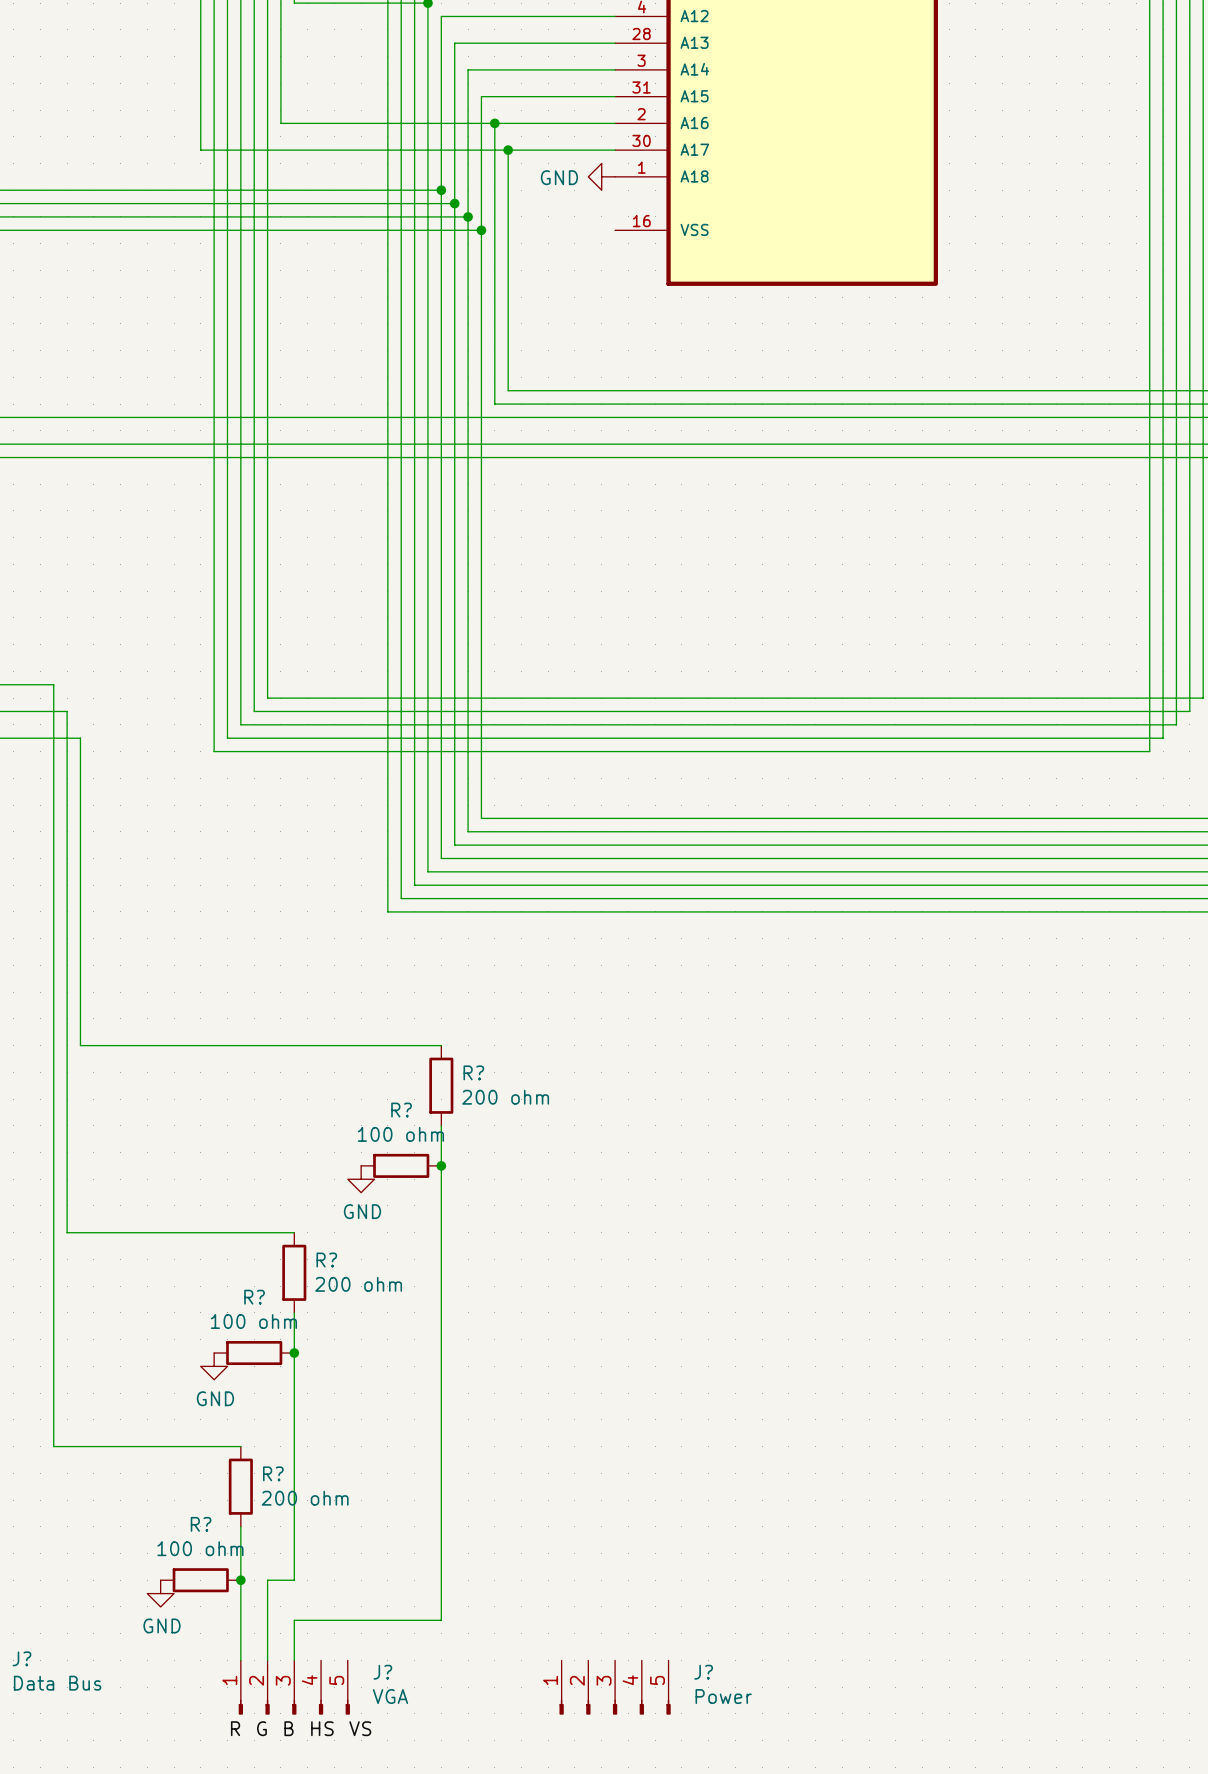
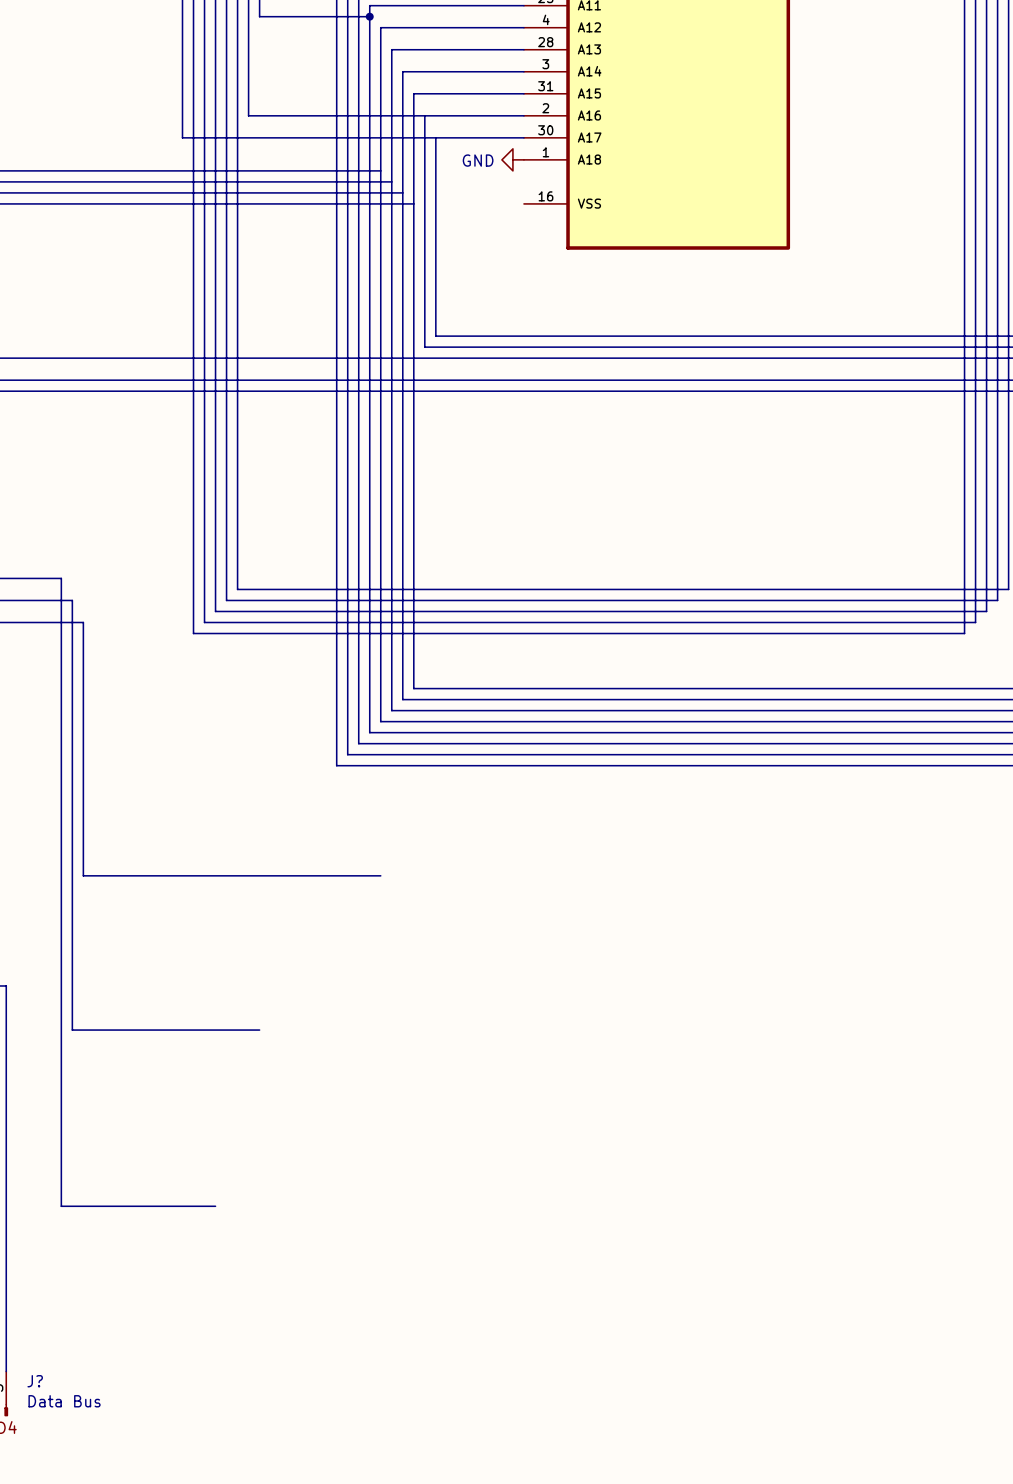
junction: (494, 123) -> none
junction: (508, 150) -> none
junction: (441, 190) -> none
junction: (454, 203) -> none
junction: (468, 216) -> none
junction: (481, 230) -> none
R?: 200 ohm (441, 1085) -> none
wire: (441, 1125) (441, 1620) (294, 1620) (294, 1660) -> none
R?: 100 ohm (401, 1165) -> none
junction: (441, 1165) -> none
power symbol: GND (361, 1179) -> none
R?: 200 ohm (294, 1272) -> none
wire: (294, 1312) (294, 1580) (267, 1580) (267, 1660) -> none
R?: 100 ohm (254, 1353) -> none
junction: (294, 1353) -> none
power symbol: GND (214, 1366) -> none
R?: 200 ohm (240, 1486) -> none
wire: (240, 1526) (240, 1660) -> none
R?: 100 ohm (200, 1580) -> none
junction: (240, 1580) -> none
power symbol: GND (160, 1593) -> none
J?: VGA (294, 1687) -> none
J?: Power (615, 1687) -> none
label: R (235, 1728) -> none
label: G (261, 1728) -> none
label: B (289, 1728) -> none
label: HS (322, 1728) -> none
label: VS (360, 1728) -> none

